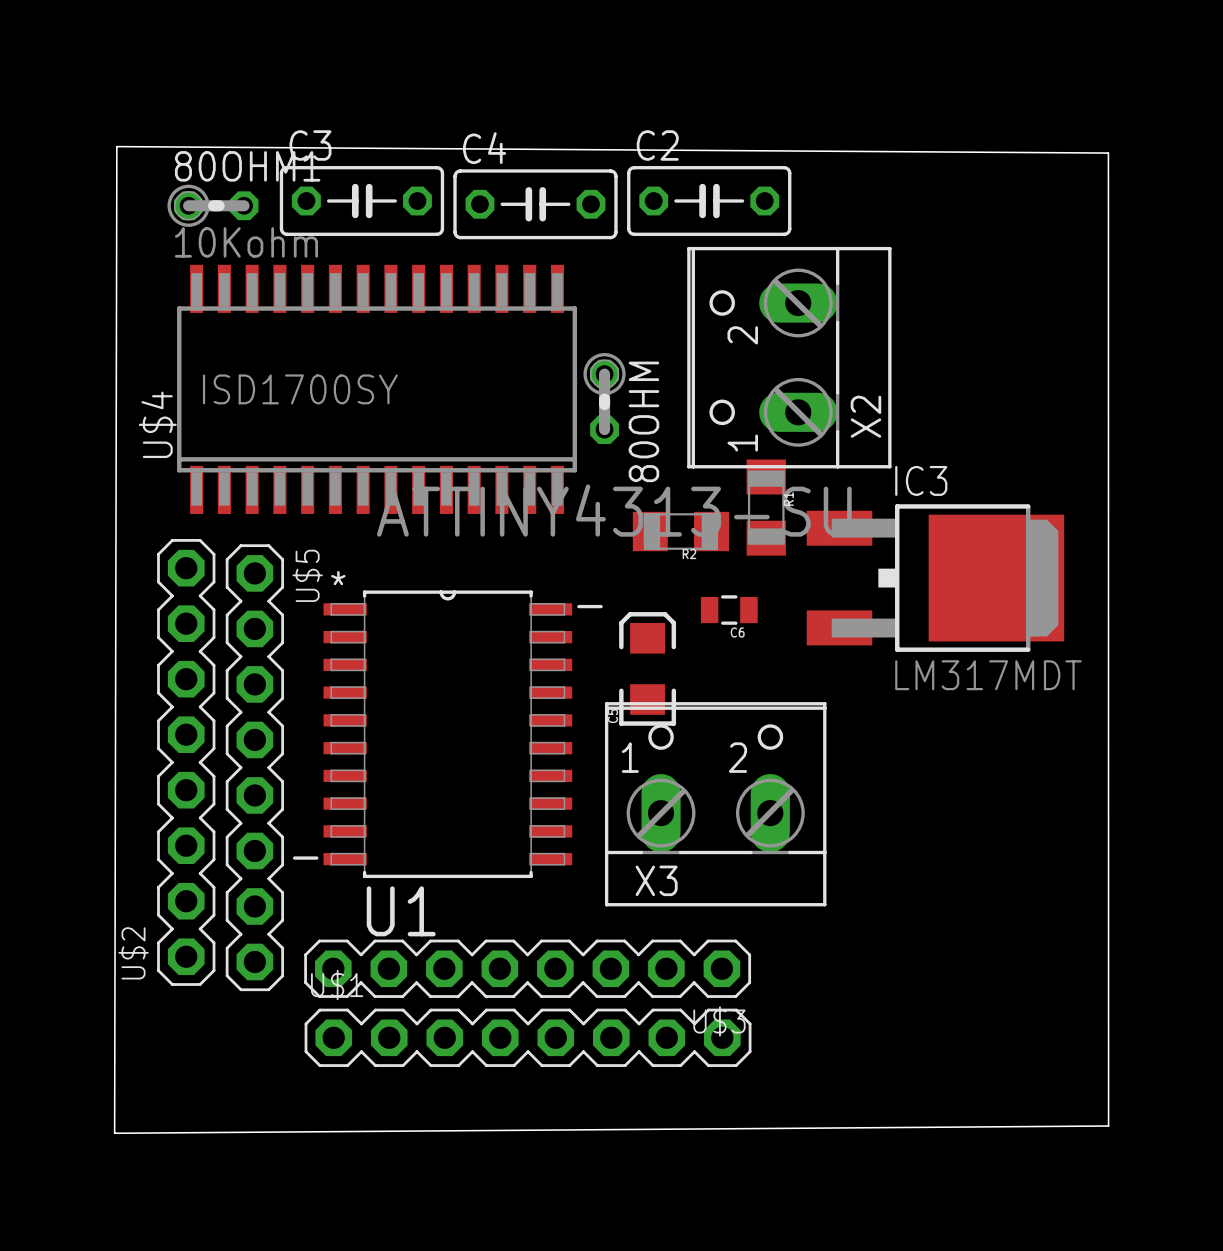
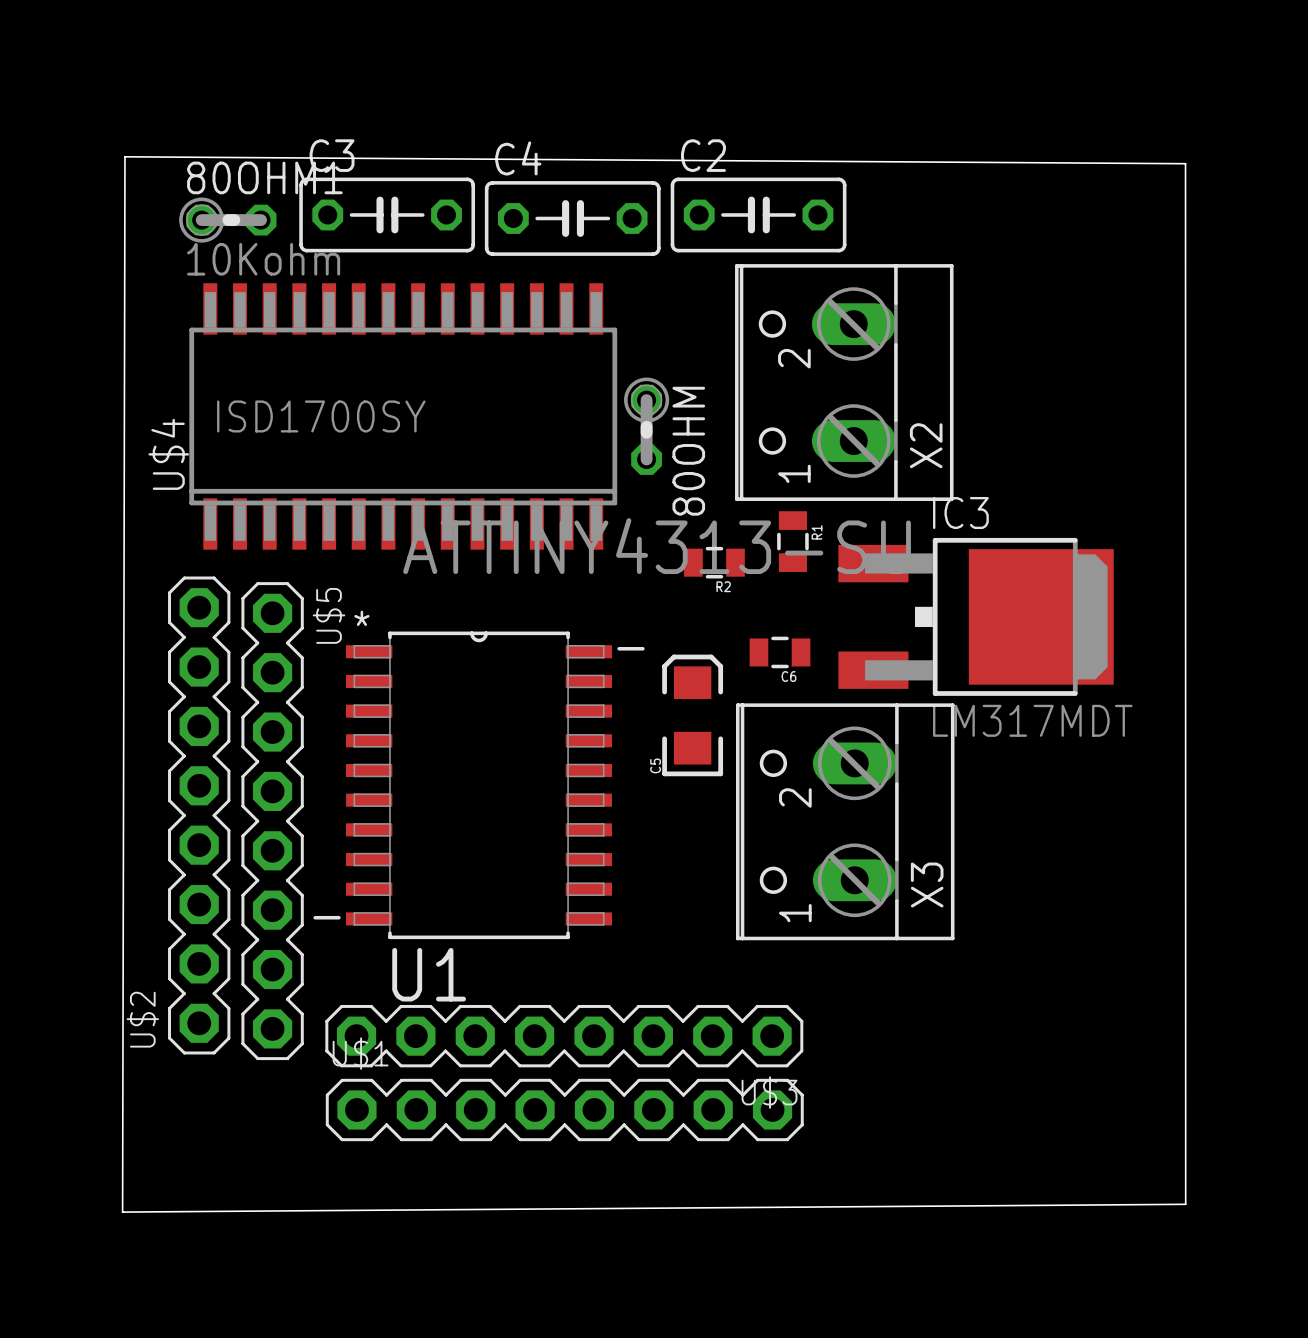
R1 footprint: [746, 459, 786, 556] -> [777, 511, 809, 572]
IC3 footprint: [806, 504, 1065, 652] -> [838, 537, 1114, 696]
R2 footprint: [632, 511, 729, 552] -> [684, 546, 745, 579]
X3 rotation: 0° (715, 804) -> 90° counterclockwise (845, 821)

